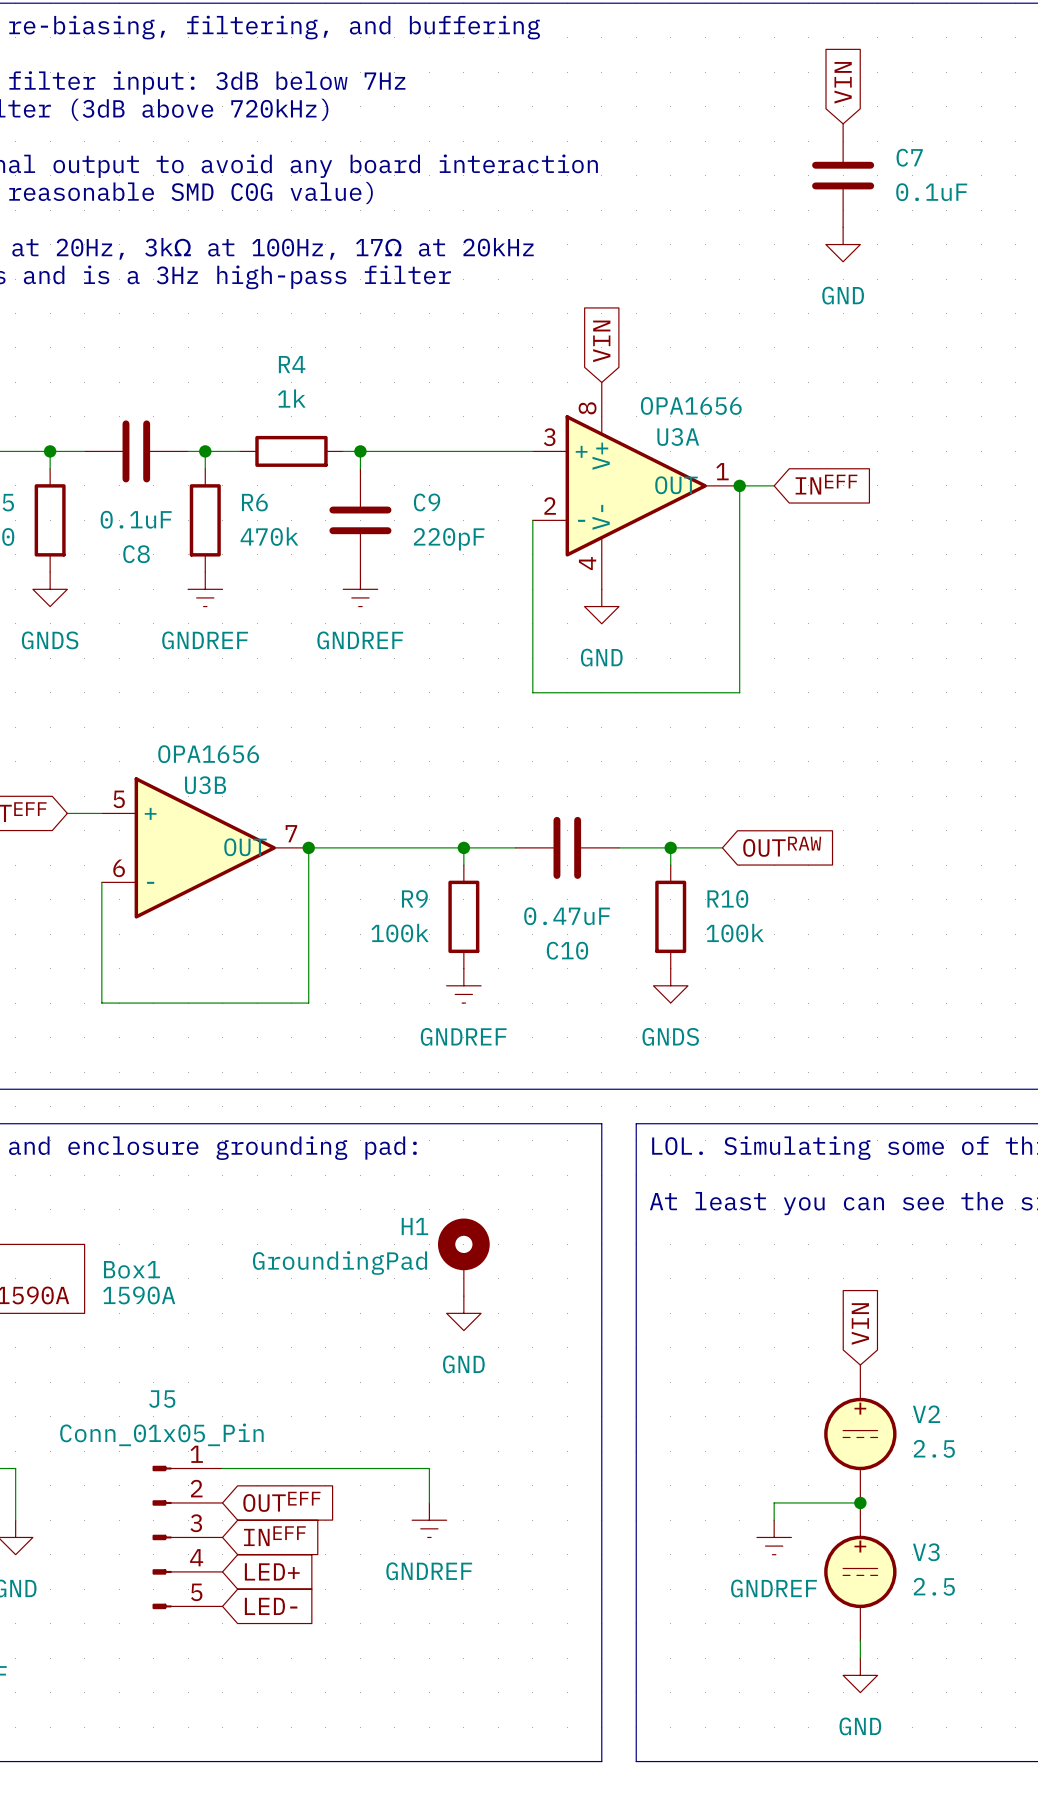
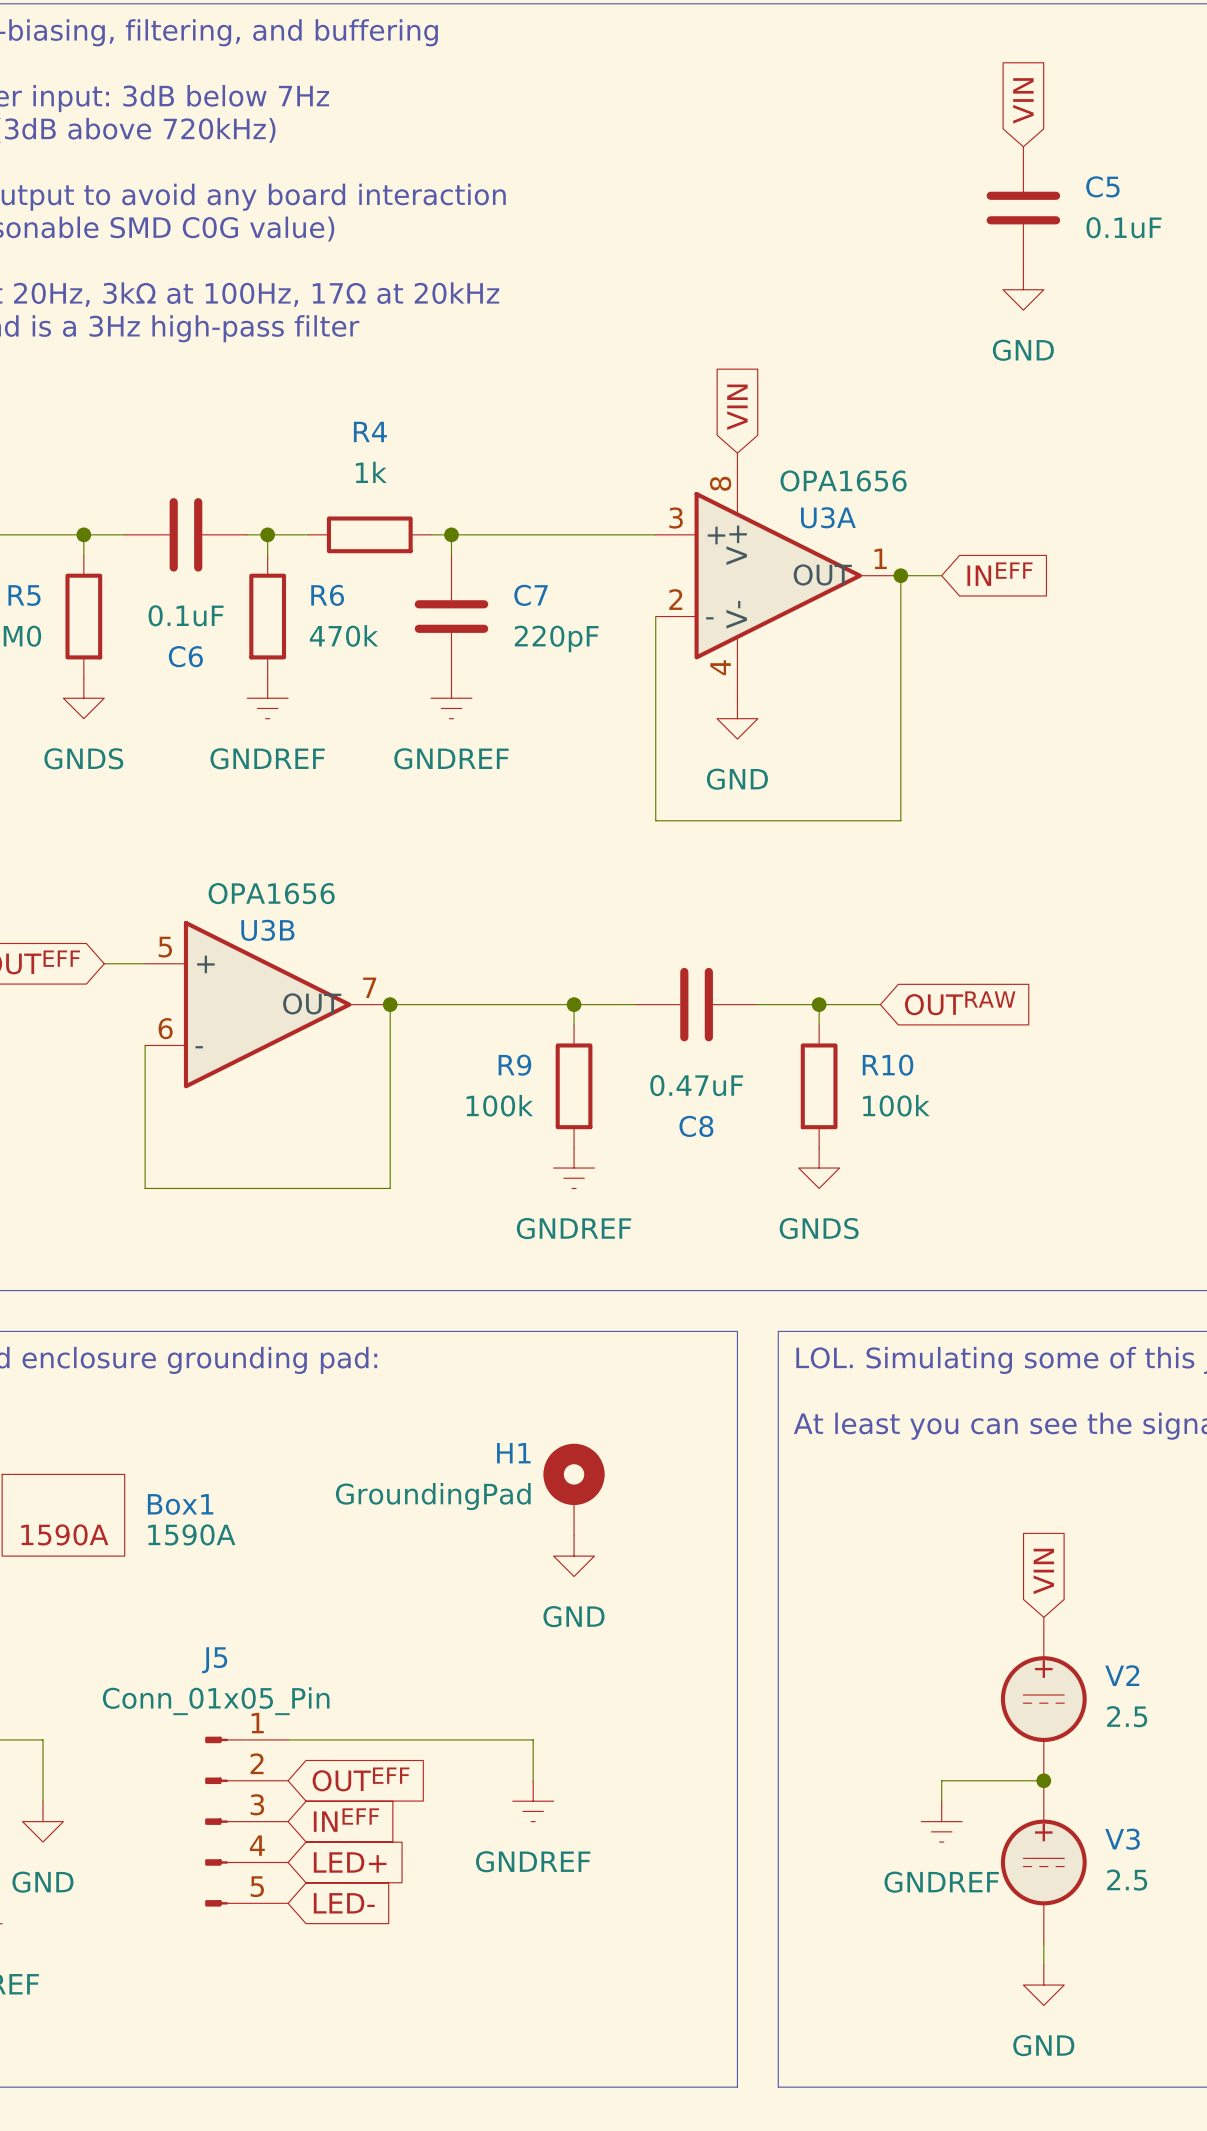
C7 name: C7 (909, 157) -> C5 (1102, 186)
C9 name: C9 (427, 502) -> C7 (531, 595)
C8 name: C8 (136, 554) -> C6 (185, 656)
C10 name: C10 (567, 950) -> C8 (696, 1126)

